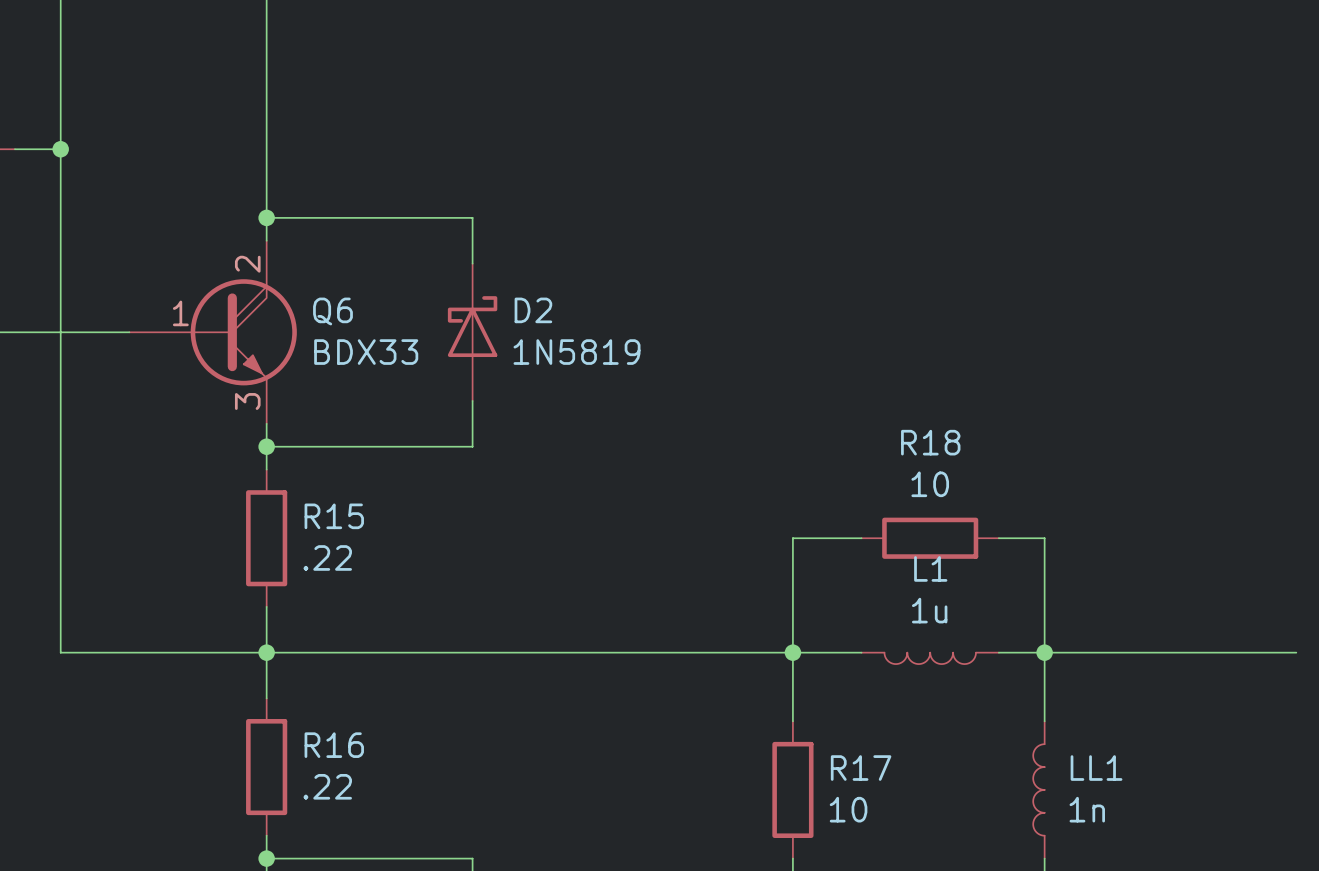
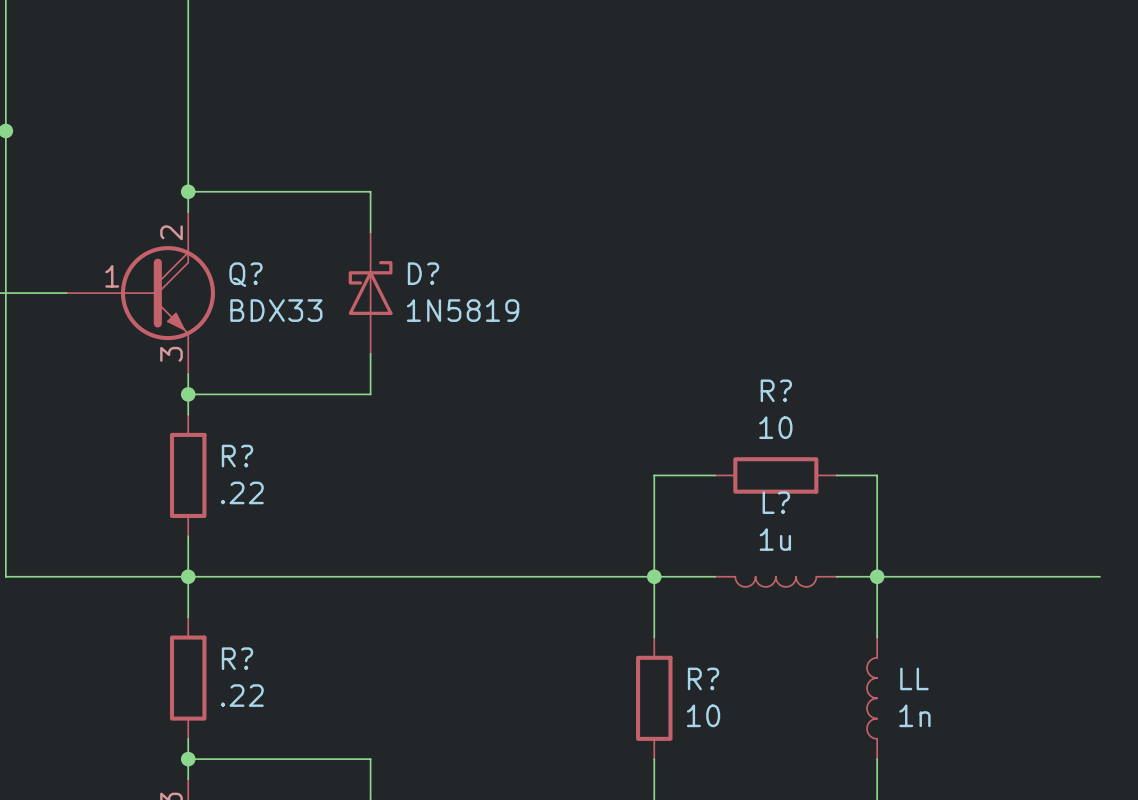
D2 name: D2 (533, 310) -> D? (423, 273)
Q6 name: Q6 (332, 311) -> Q? (245, 274)
R18 name: R18 (930, 442) -> R? (776, 390)
R15 name: R15 (334, 516) -> R? (237, 456)
L1 name: L1 (930, 568) -> L? (776, 502)
R16 name: R16 (334, 745) -> R? (237, 658)
R17 name: R17 (861, 768) -> R? (703, 678)
LL1 name: LL1 (1096, 768) -> LL (914, 678)

